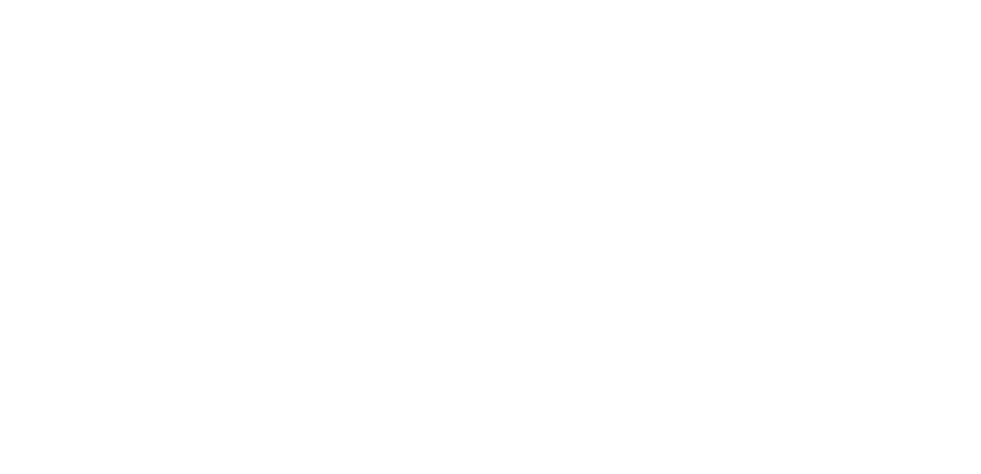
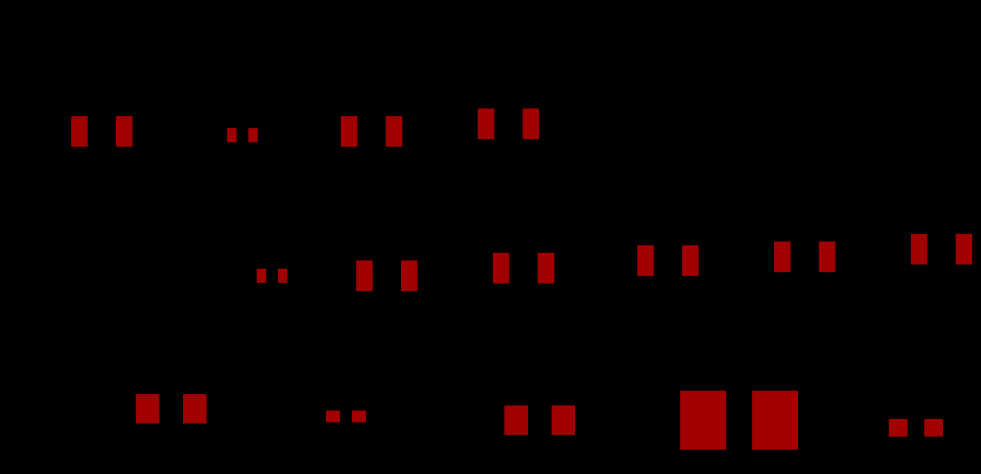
part: none -> (508, 123)
part: none -> (101, 131)
part: none -> (371, 131)
part: none -> (242, 135)
part: none -> (941, 249)
part: none -> (804, 256)
part: none -> (667, 260)
part: none -> (523, 268)
part: none -> (272, 275)
part: none -> (386, 275)
part: none -> (171, 408)
part: none -> (345, 416)
part: none -> (539, 420)
part: none -> (739, 420)
part: none -> (915, 427)

